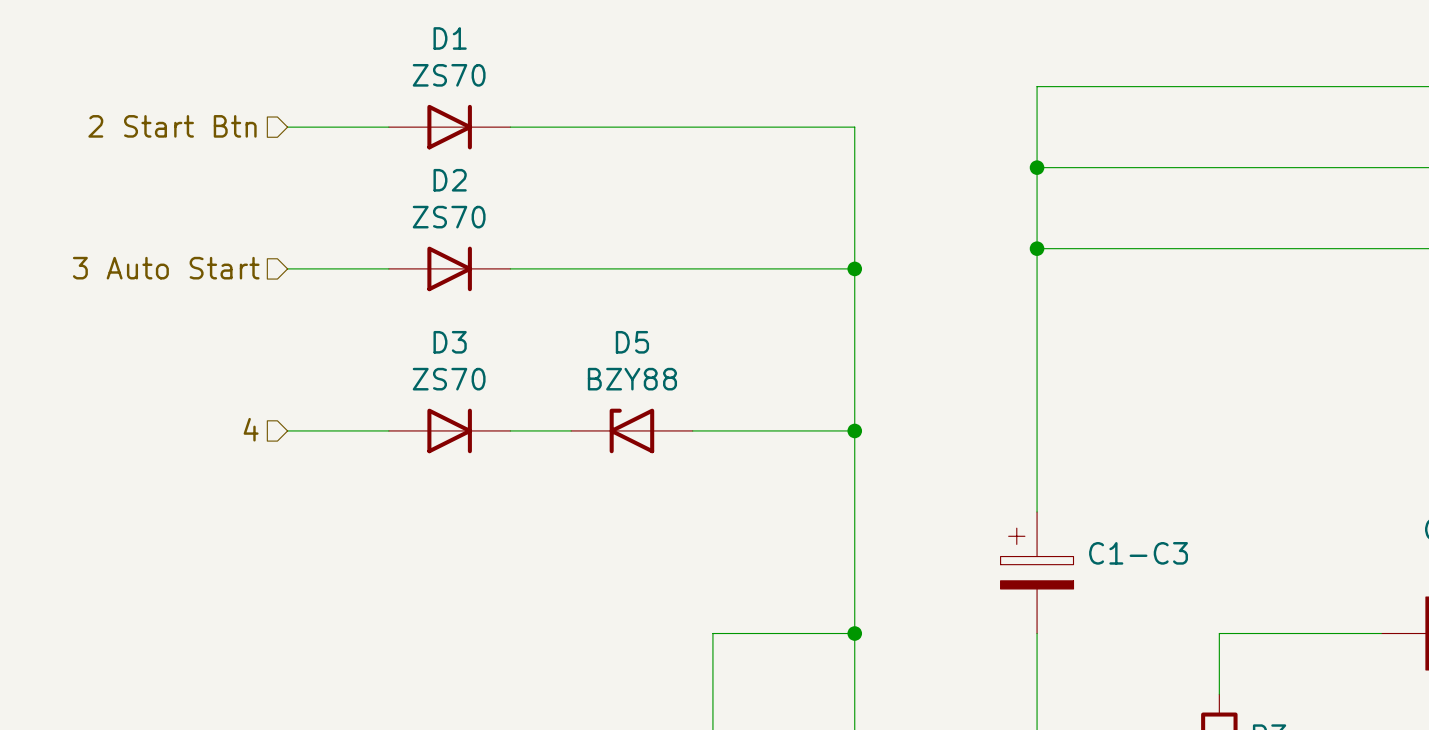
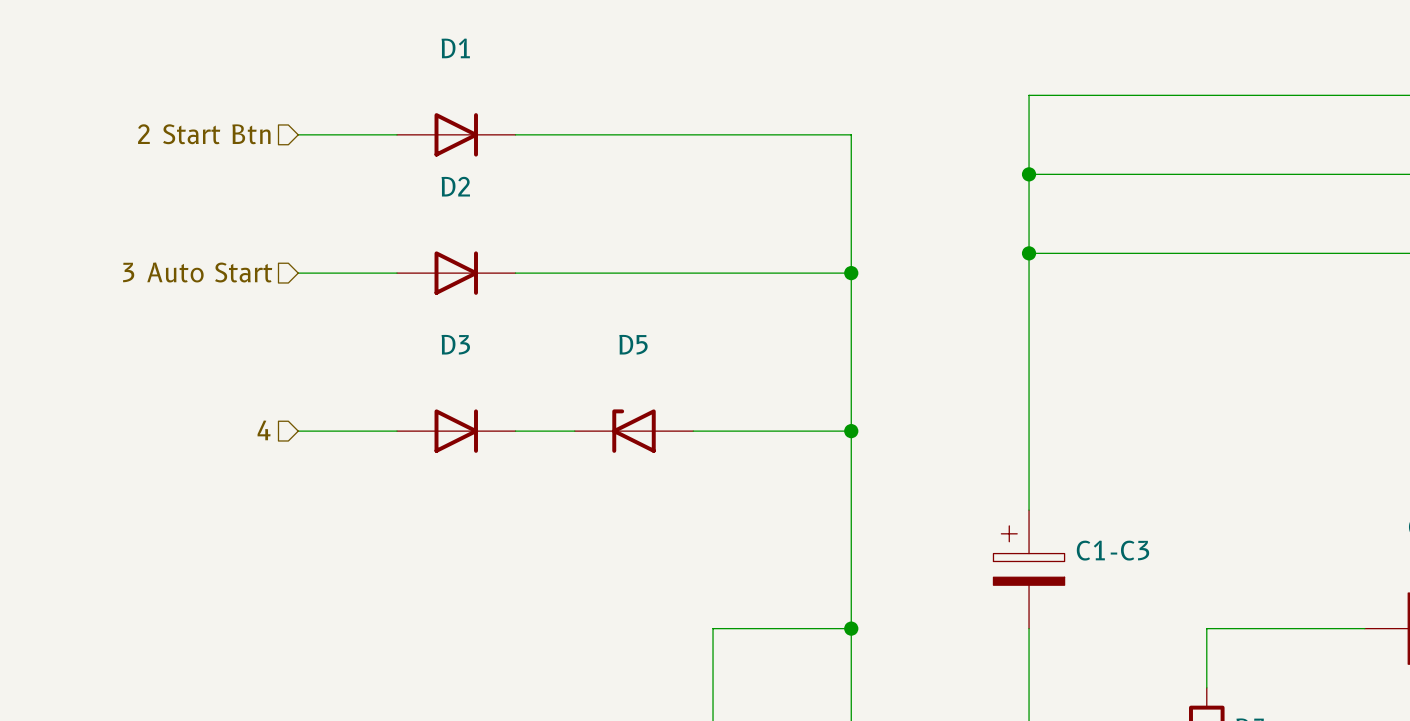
D1 value: ZS70 (449, 75) -> none
D2 value: ZS70 (449, 217) -> none
D3 value: ZS70 (449, 379) -> none
D5 value: BZY88 (632, 379) -> none

